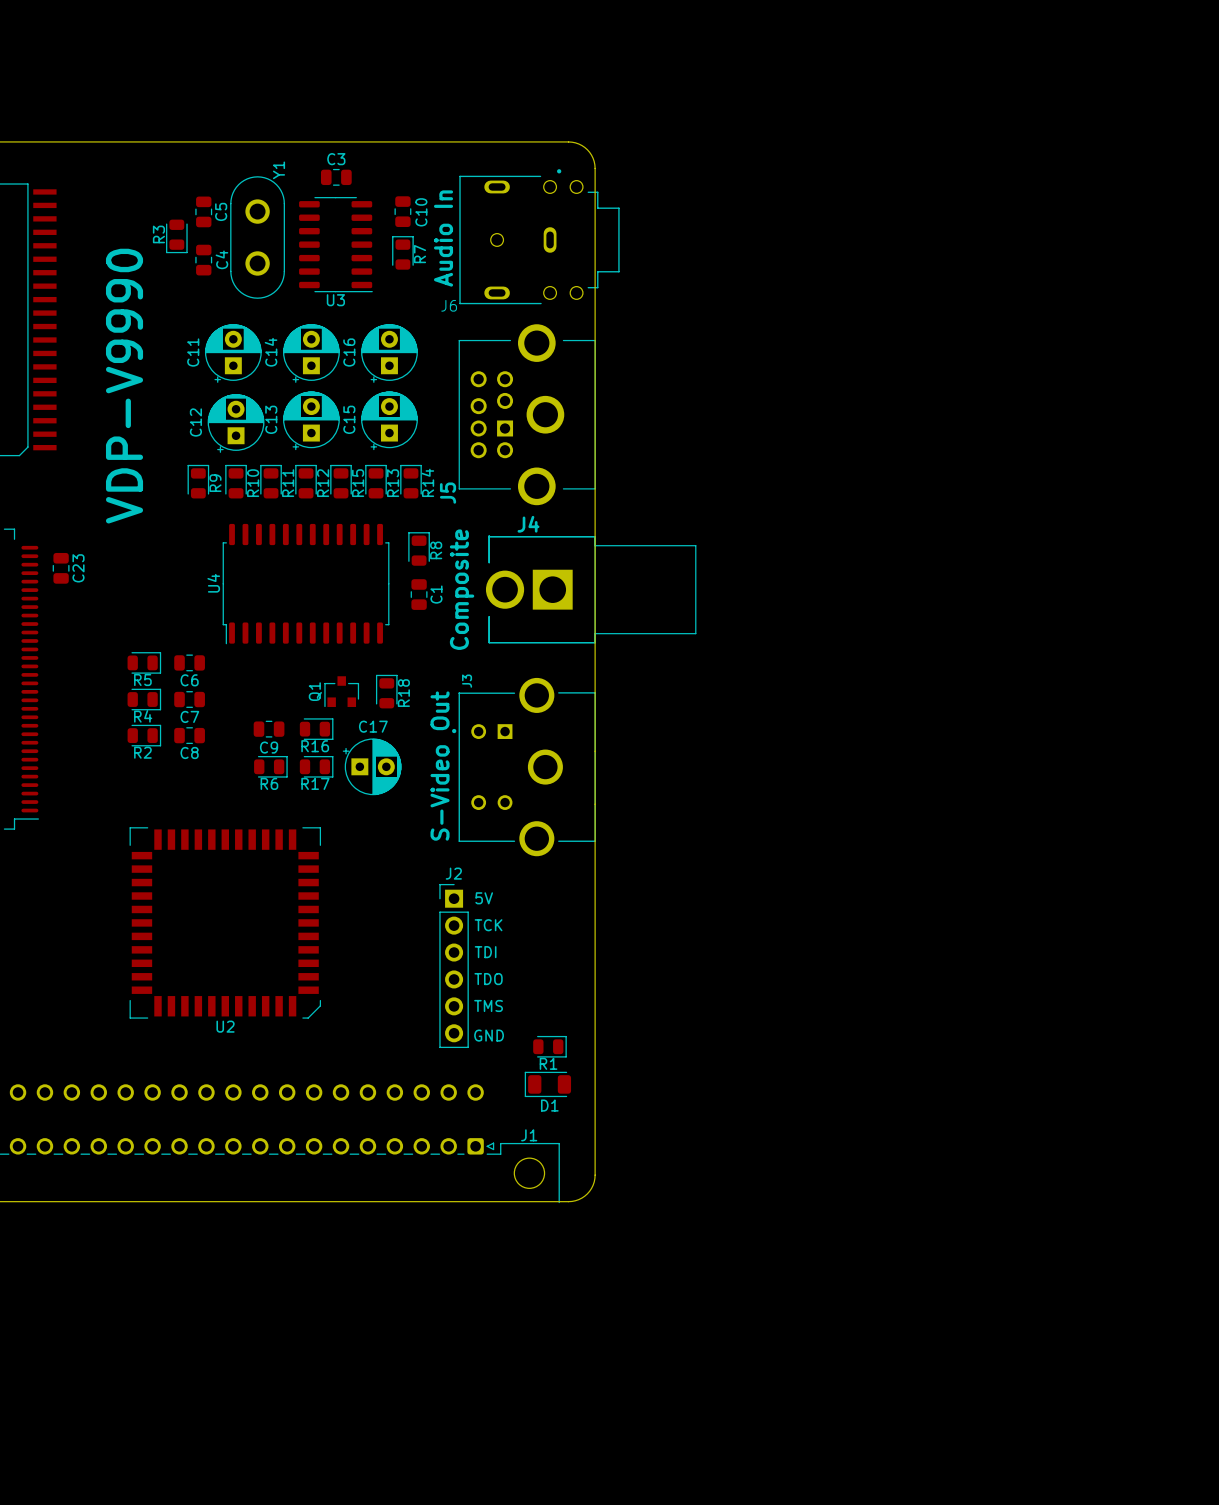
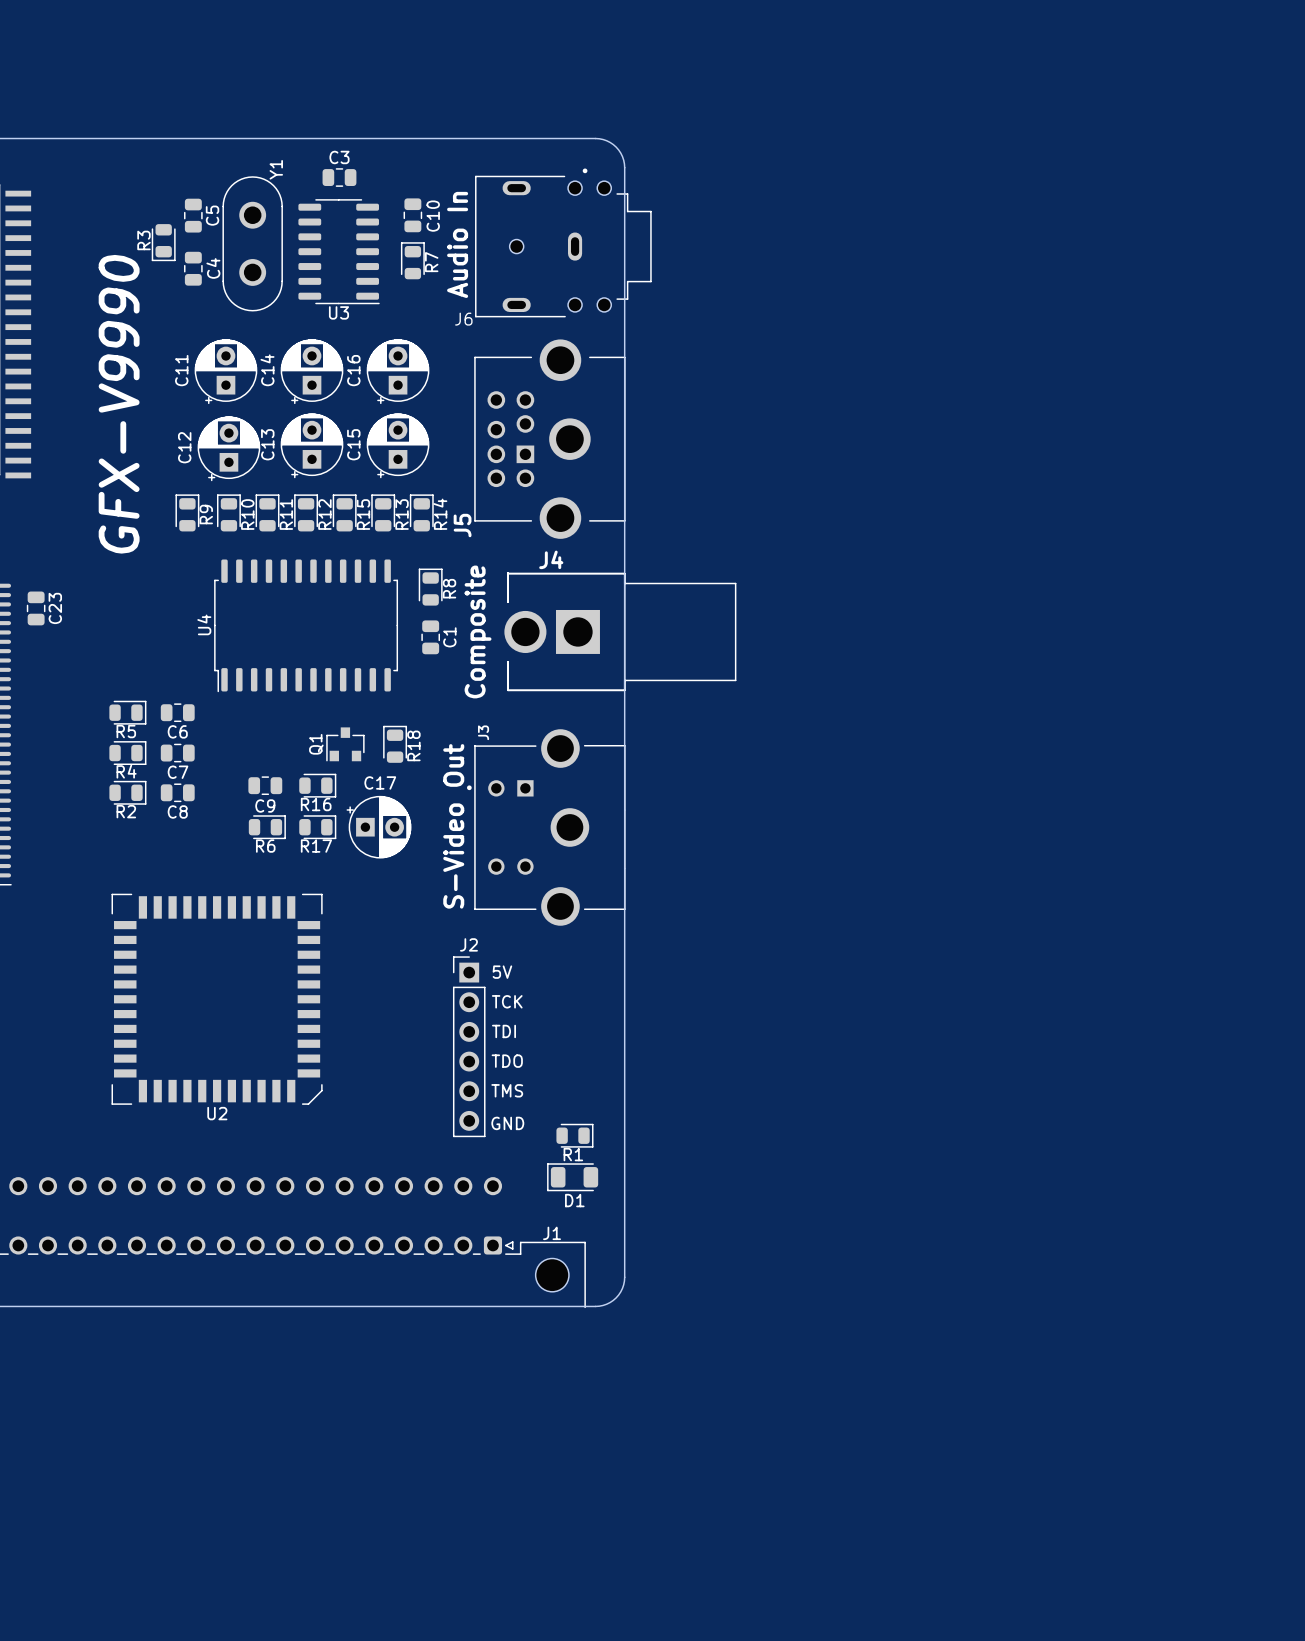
text: VDP-V9990 (124, 386) -> GFX-V9990 (119, 404)

